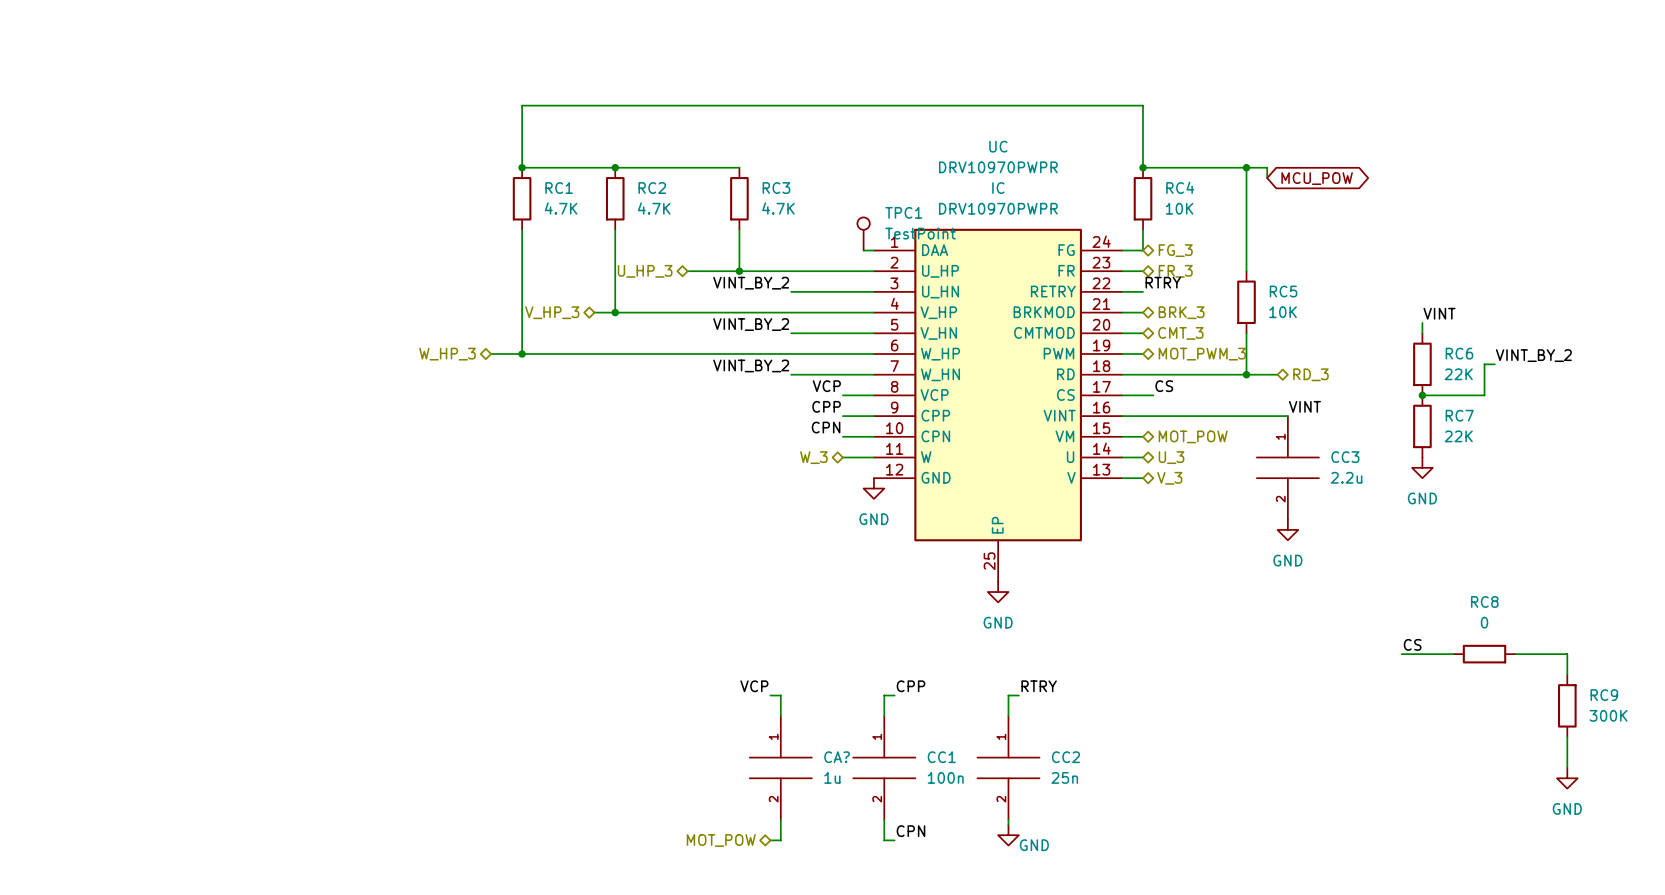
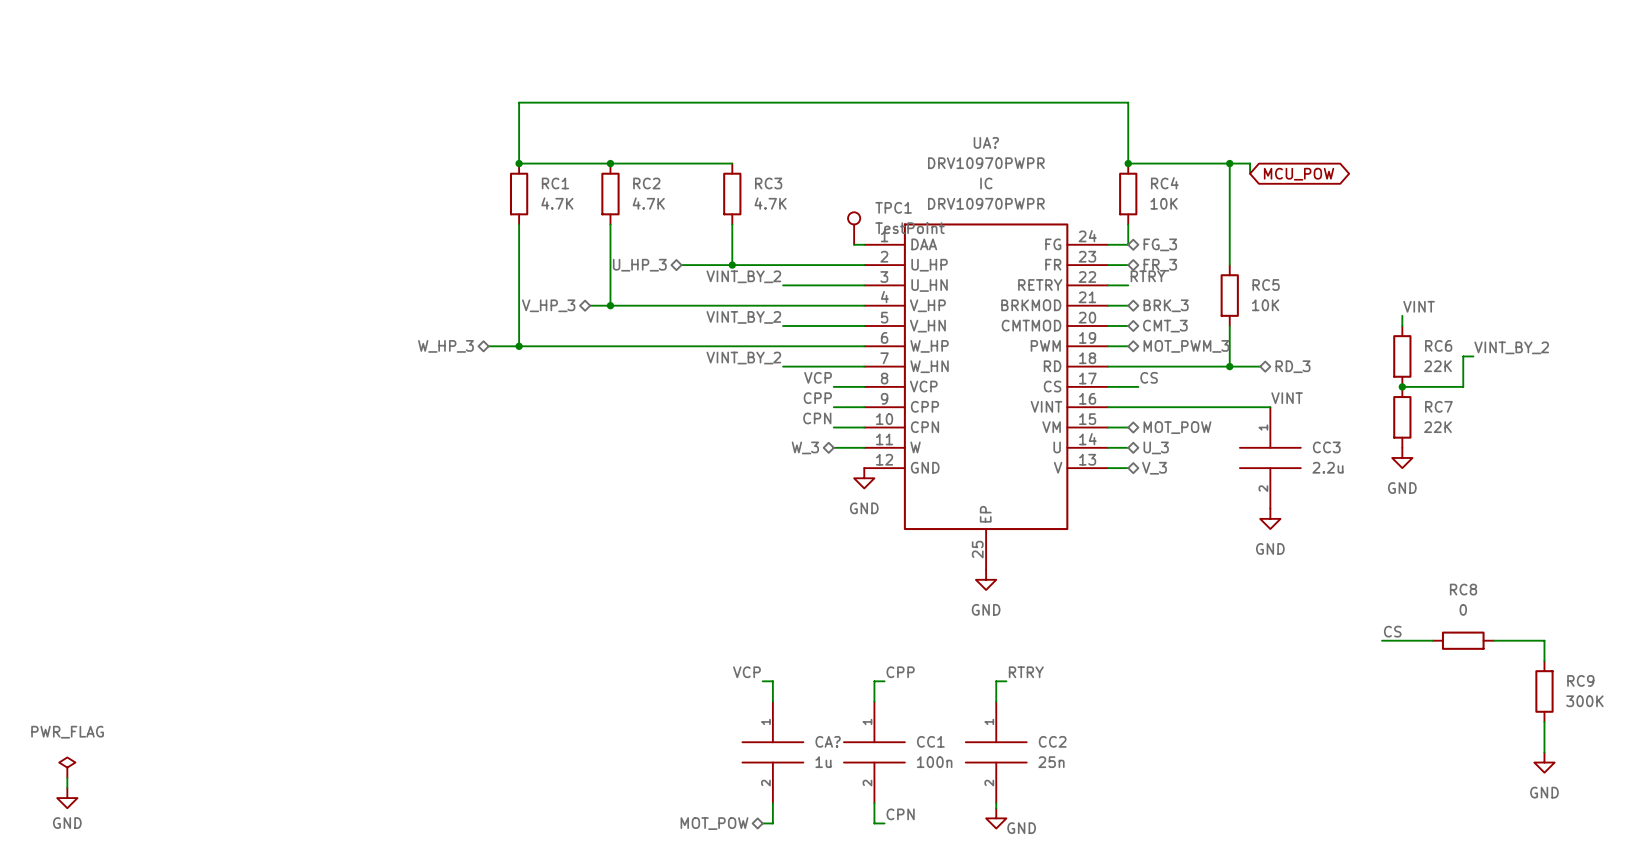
UC name: UC (998, 146) -> UA? (986, 142)
power symbol: none -> PWR_FLAG (67, 767)
wire: none -> (67, 777) (67, 787)
power symbol: none -> GND (67, 798)

